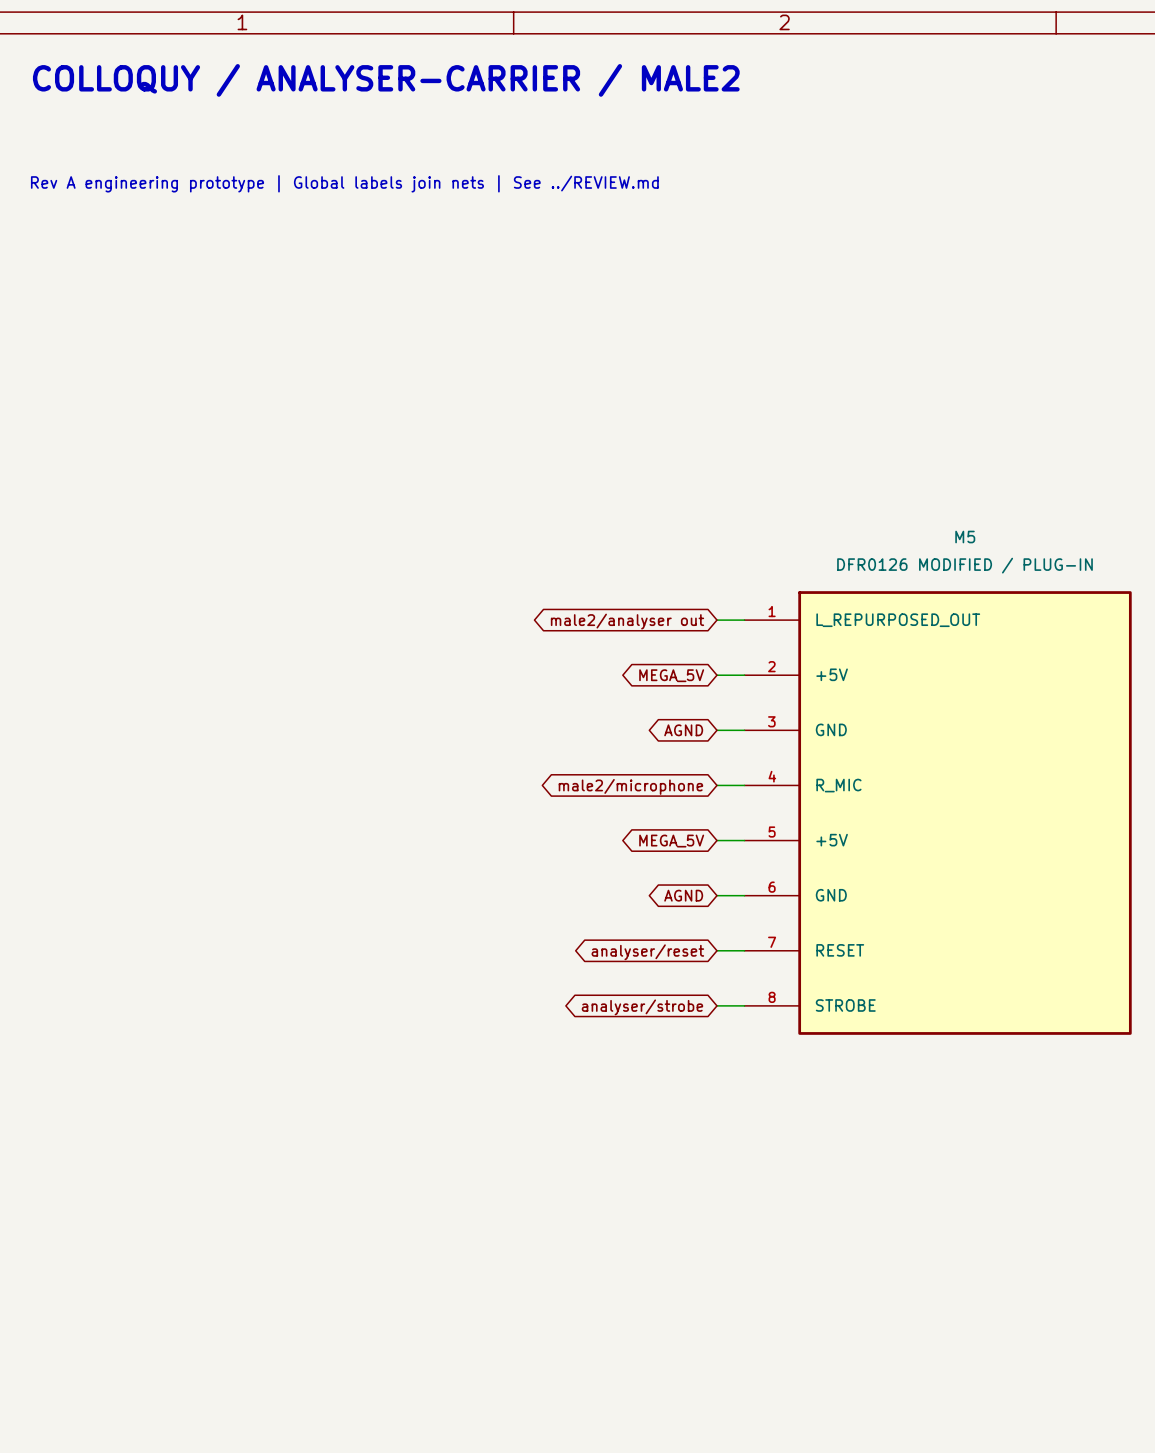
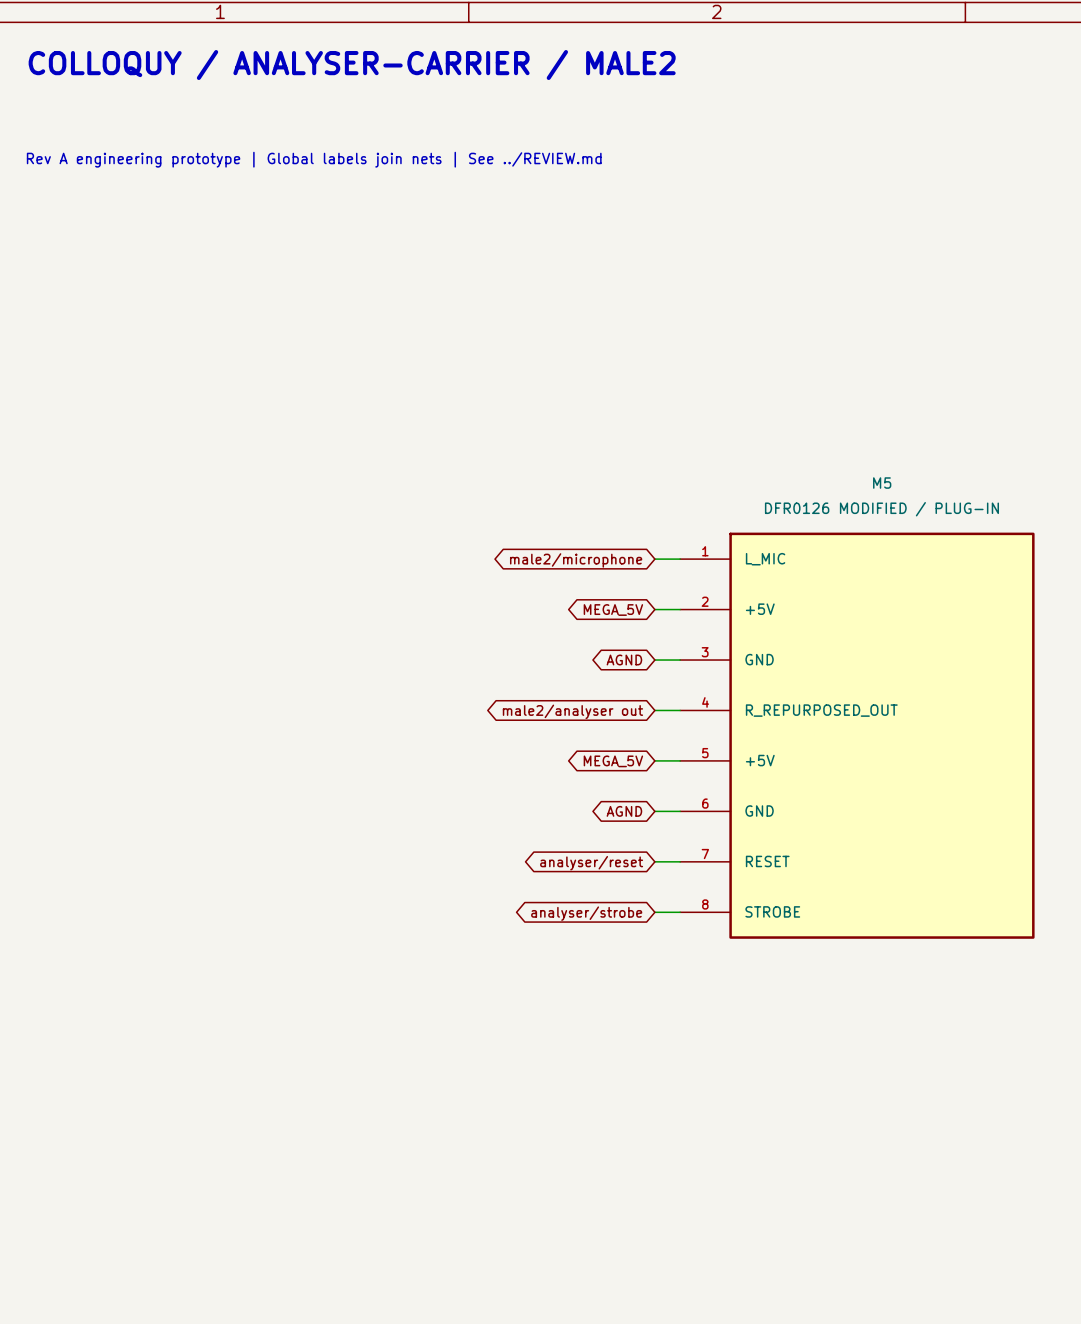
M5 pin name: L_REPURPOSED_OUT (898, 620) -> L_MIC (765, 559)
global label: male2/analyser out (627, 621) -> male2/microphone (576, 560)
M5 pin name: R_MIC (838, 785) -> R_REPURPOSED_OUT (821, 710)
global label: male2/microphone (630, 786) -> male2/analyser out (572, 711)

